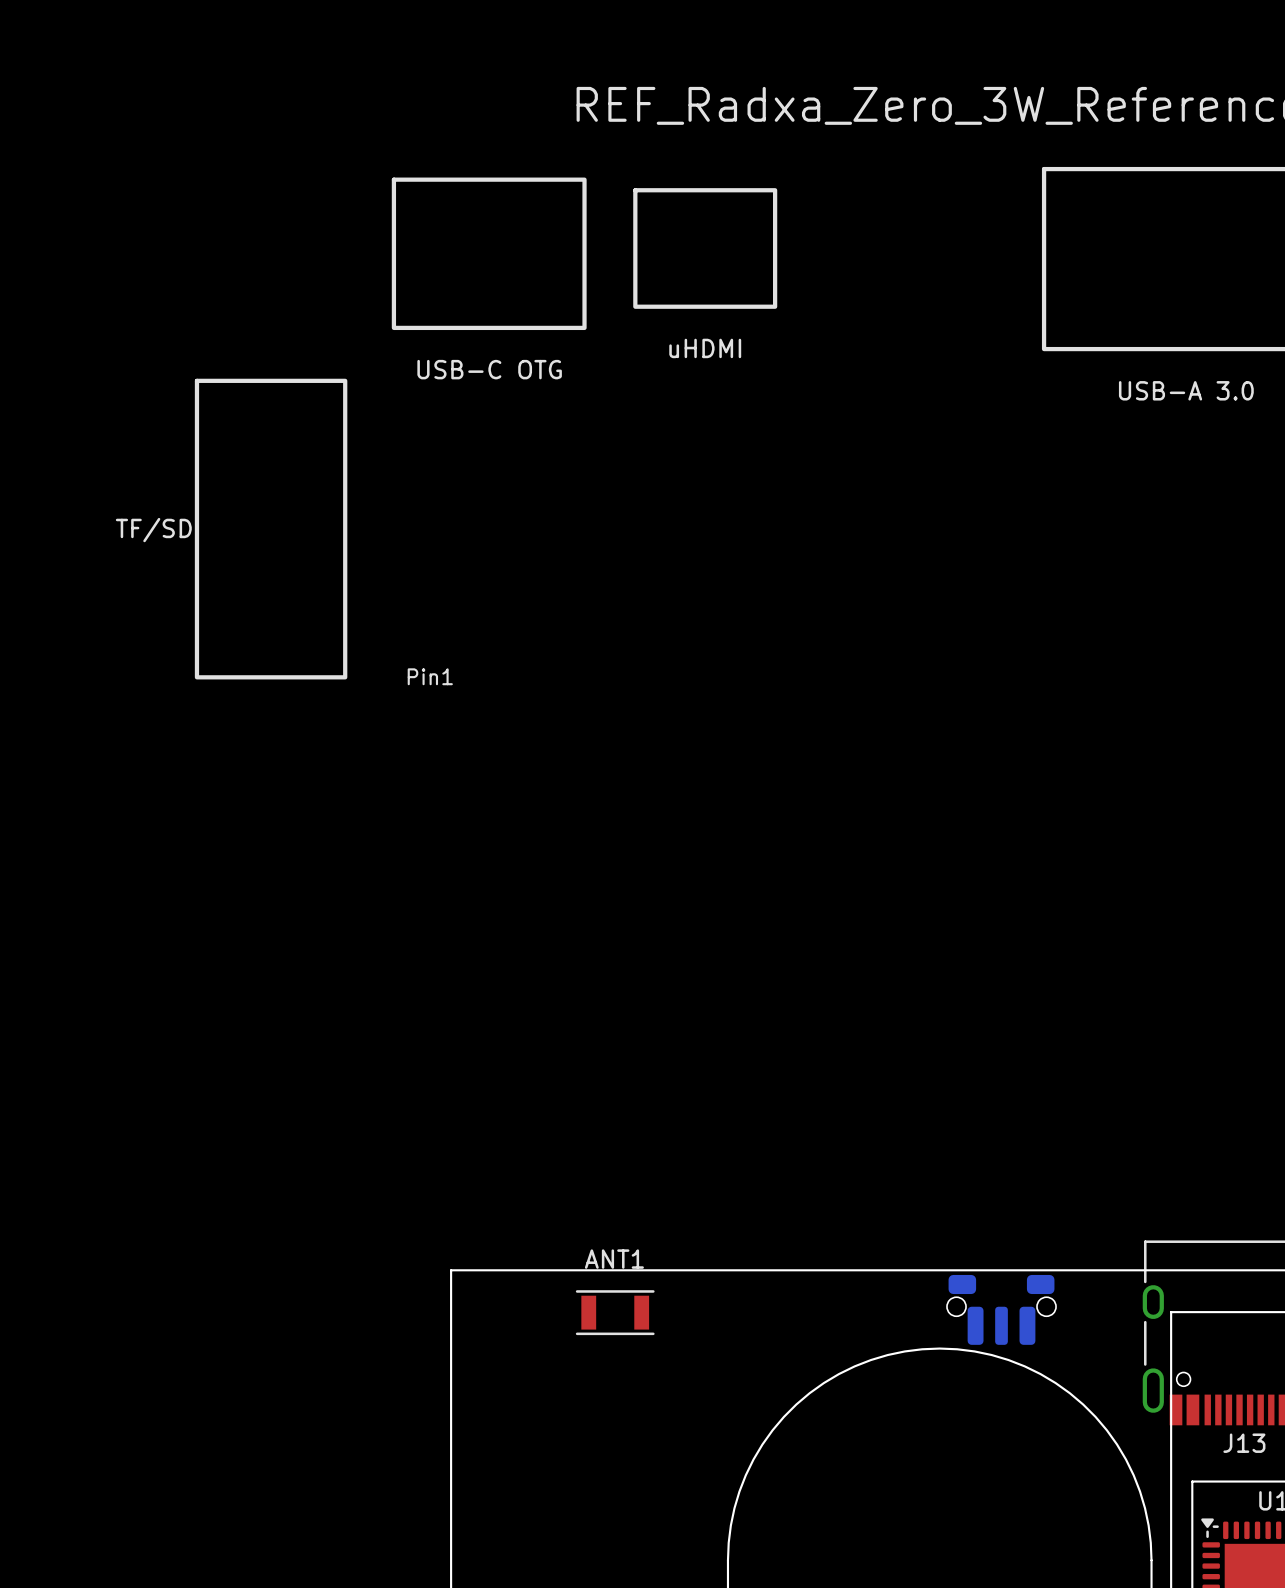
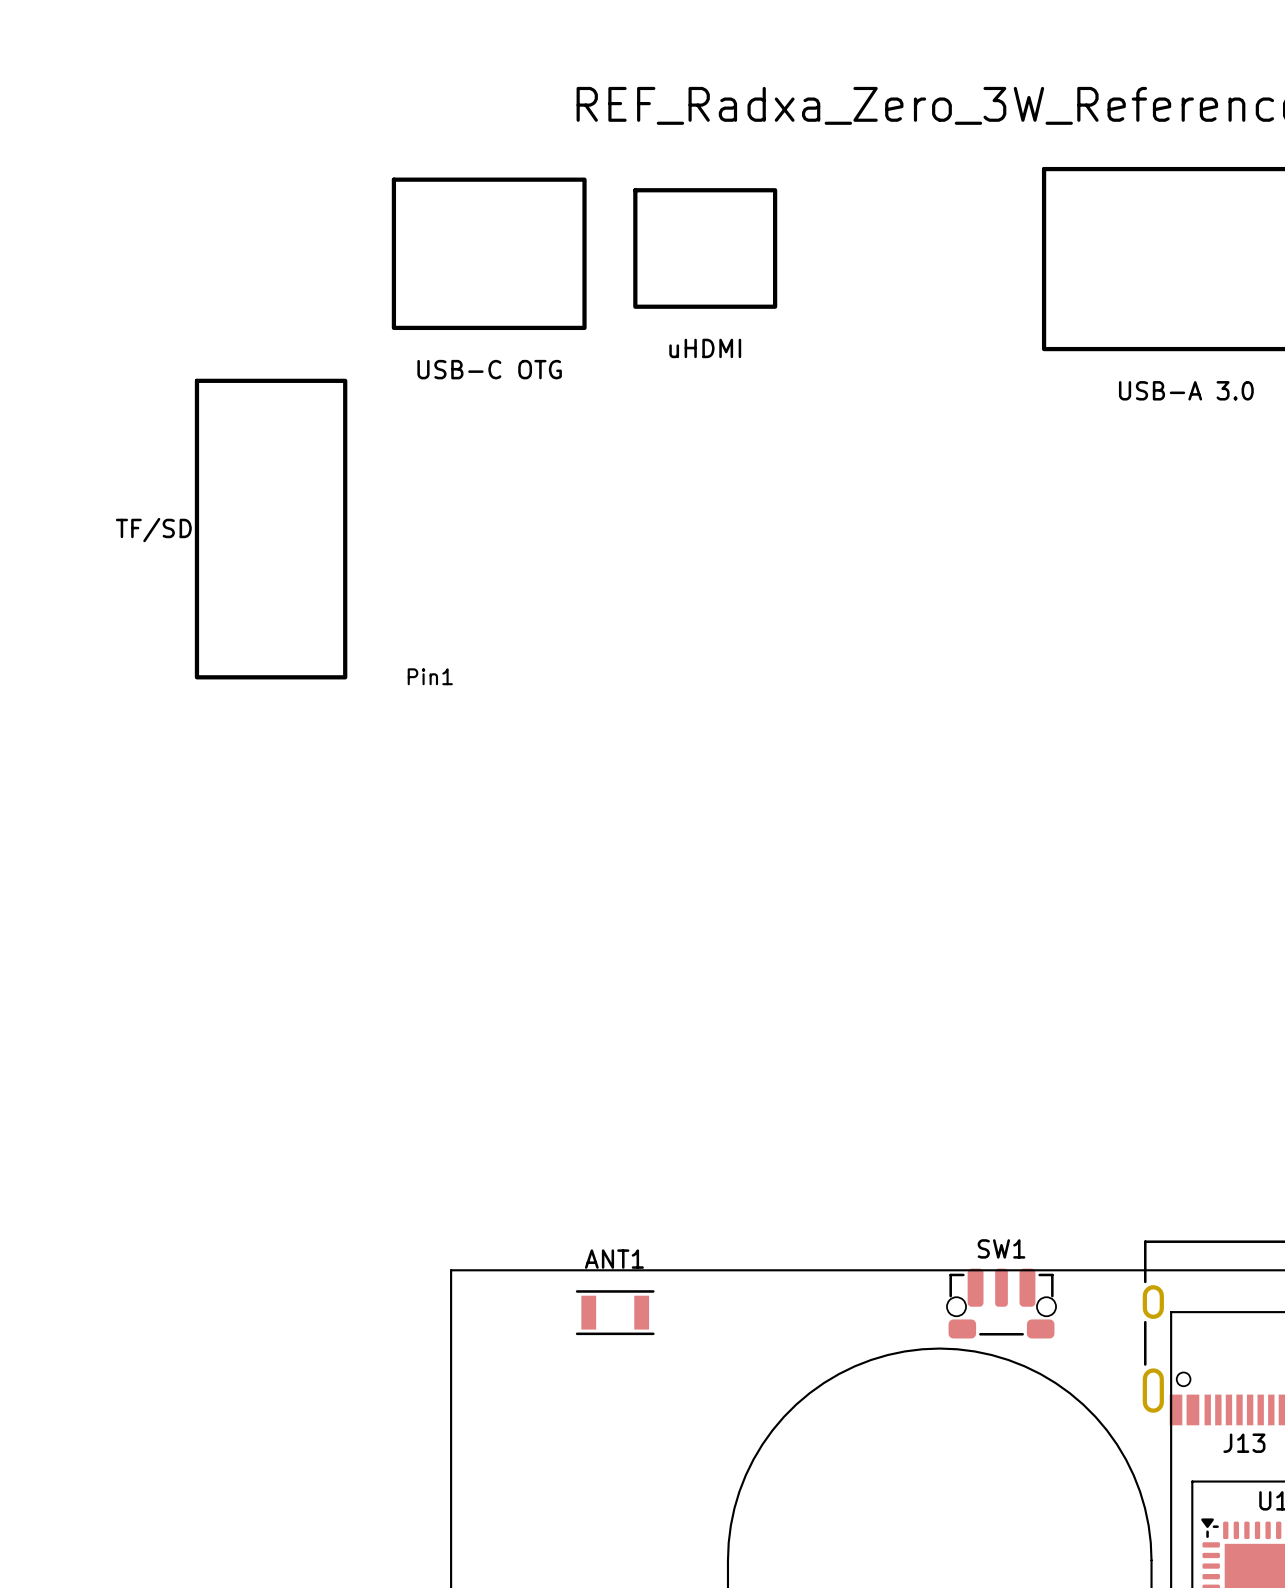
SW1 side: bottom (1001, 1309) -> top (1001, 1303)

